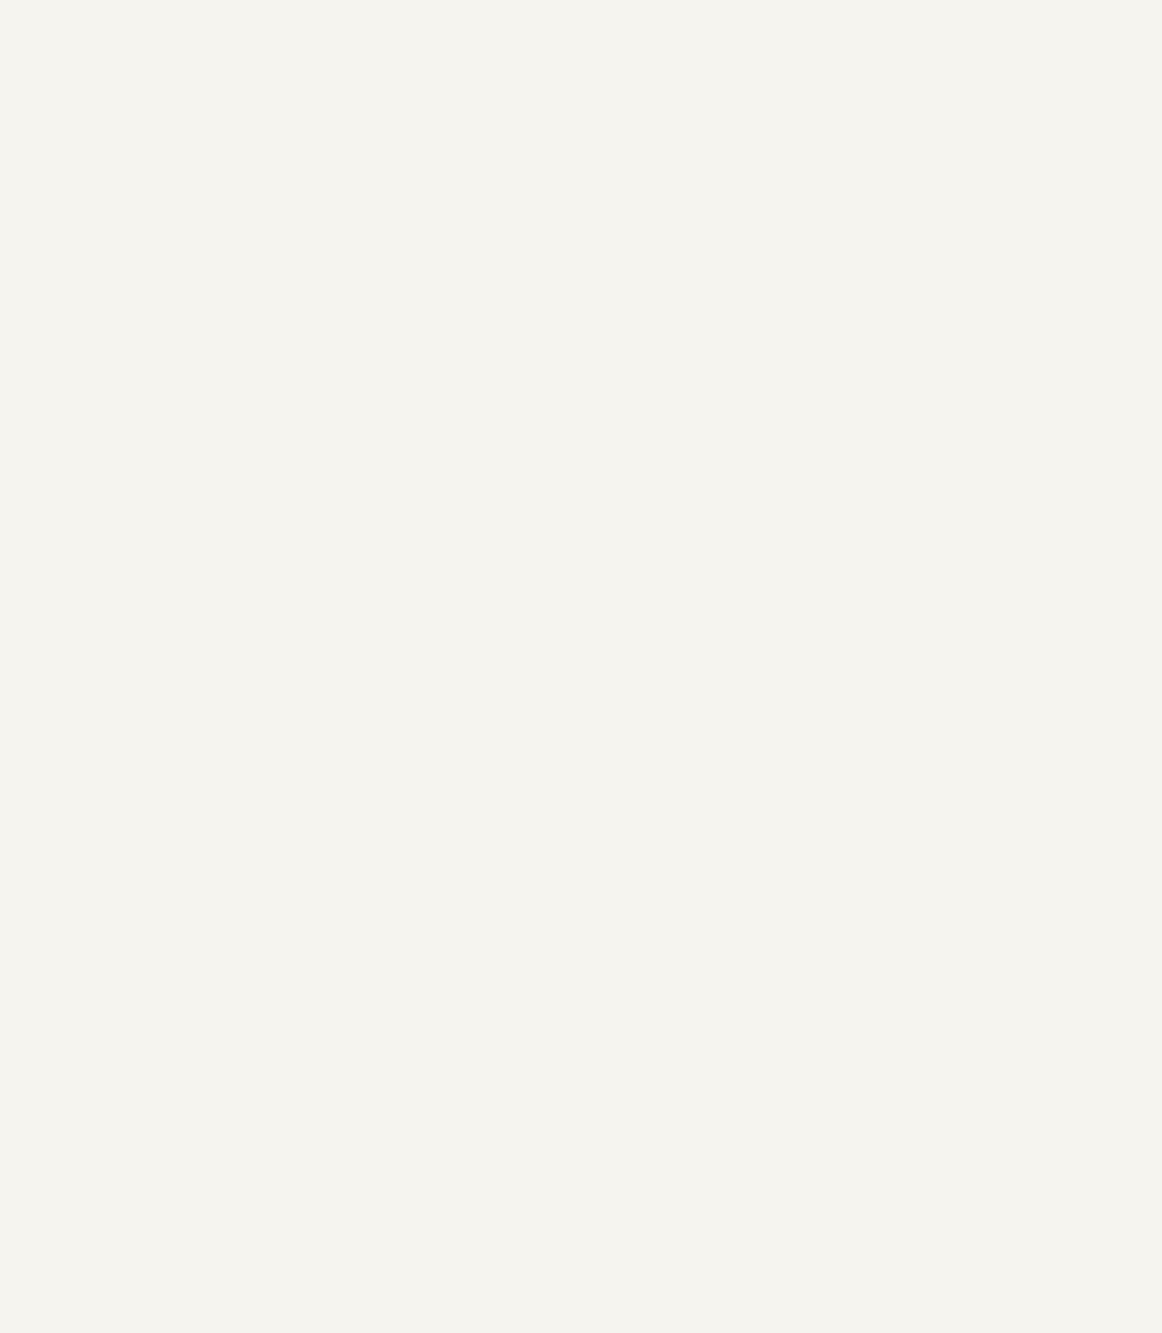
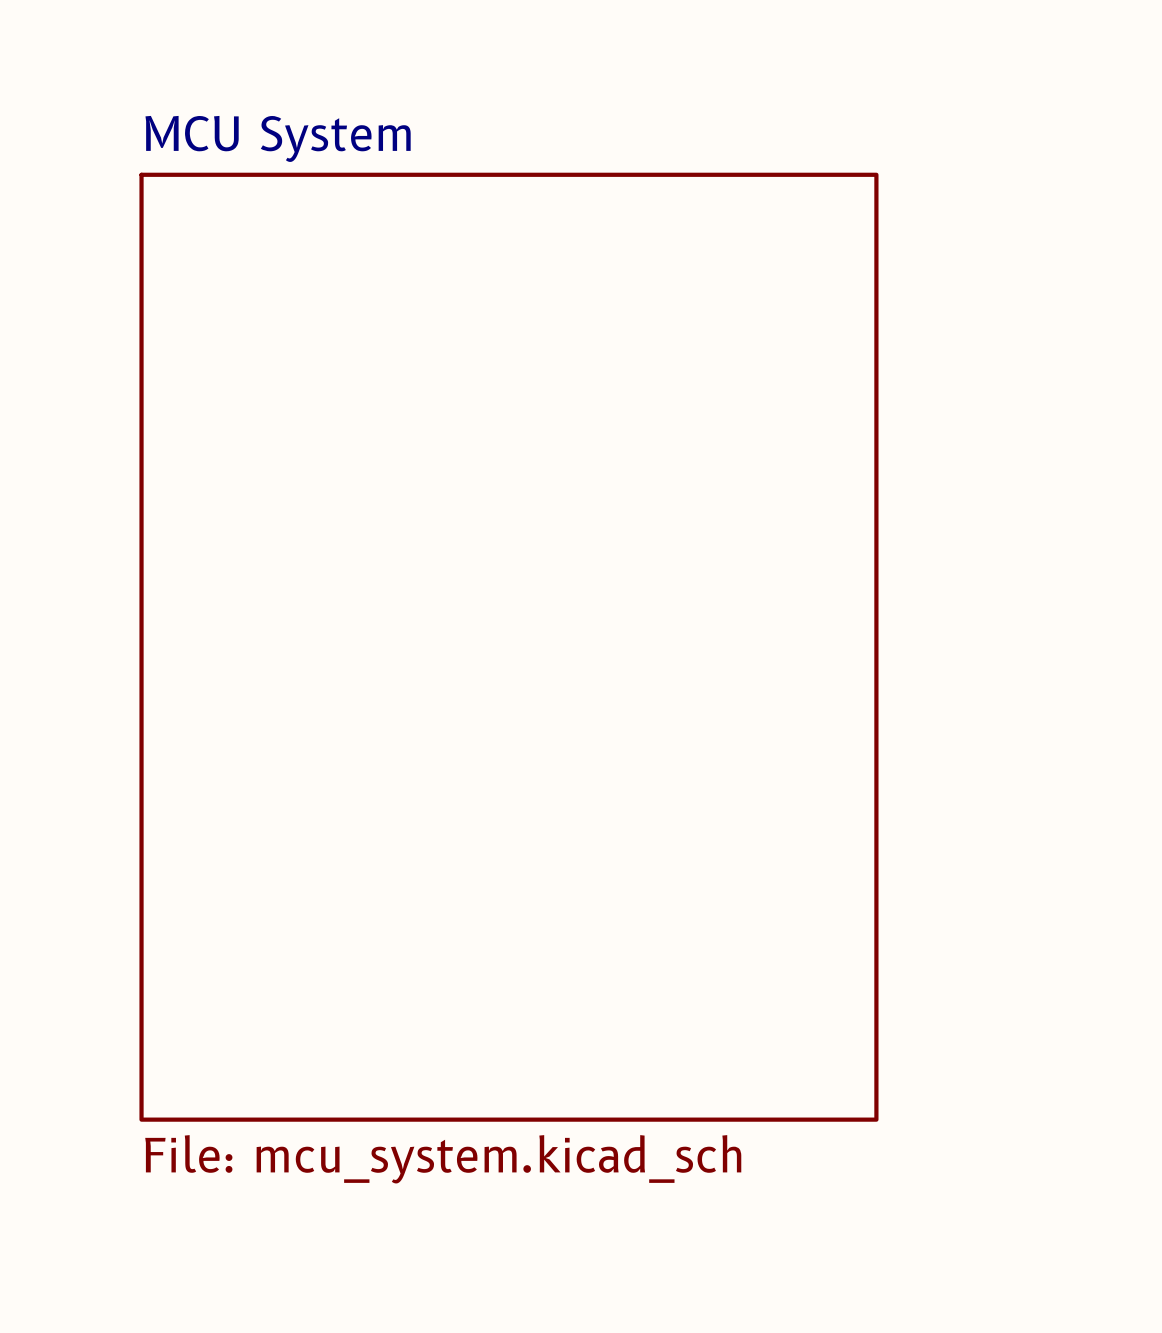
sheet MCU System: none -> File: mcu_system.kicad_sch (508, 647)

